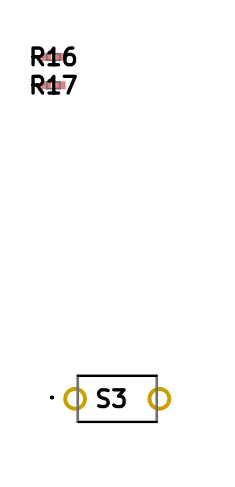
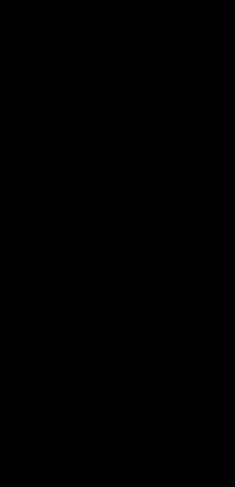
R16: (53, 57) -> none
R17: (53, 85) -> none
S3: (110, 398) -> none

